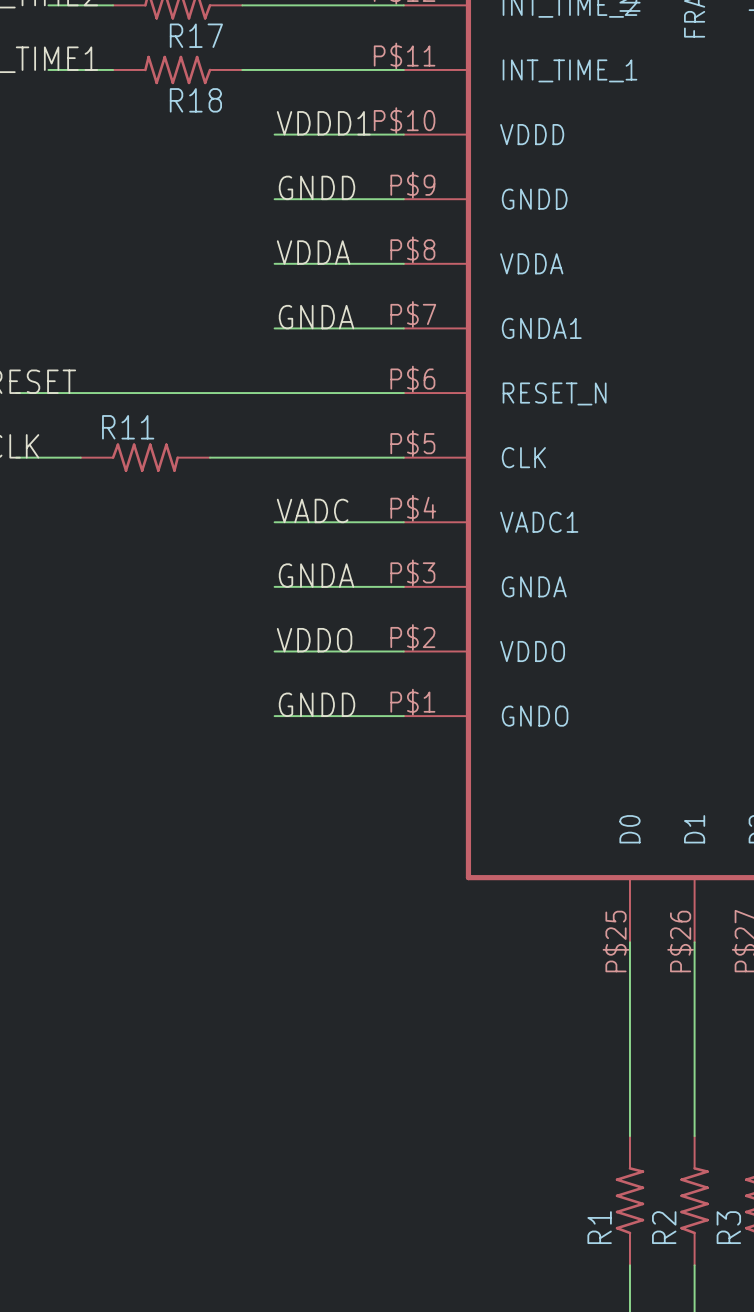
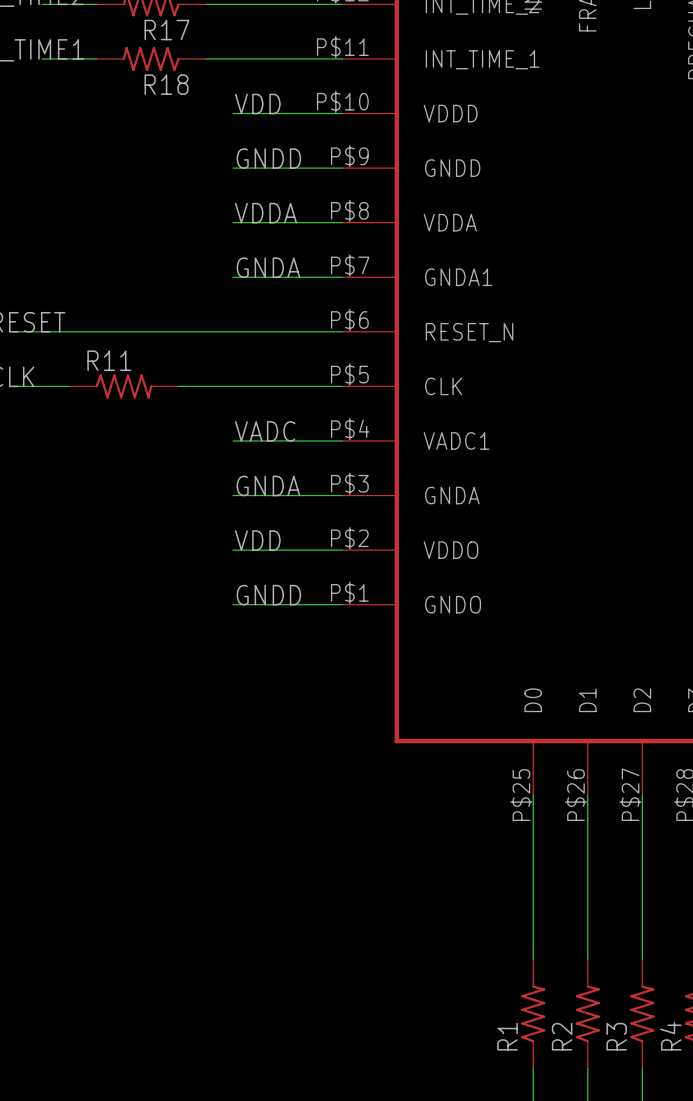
label: VDDD1 (323, 123) -> VDD (257, 103)
label: VDDO (314, 640) -> VDD (257, 540)

